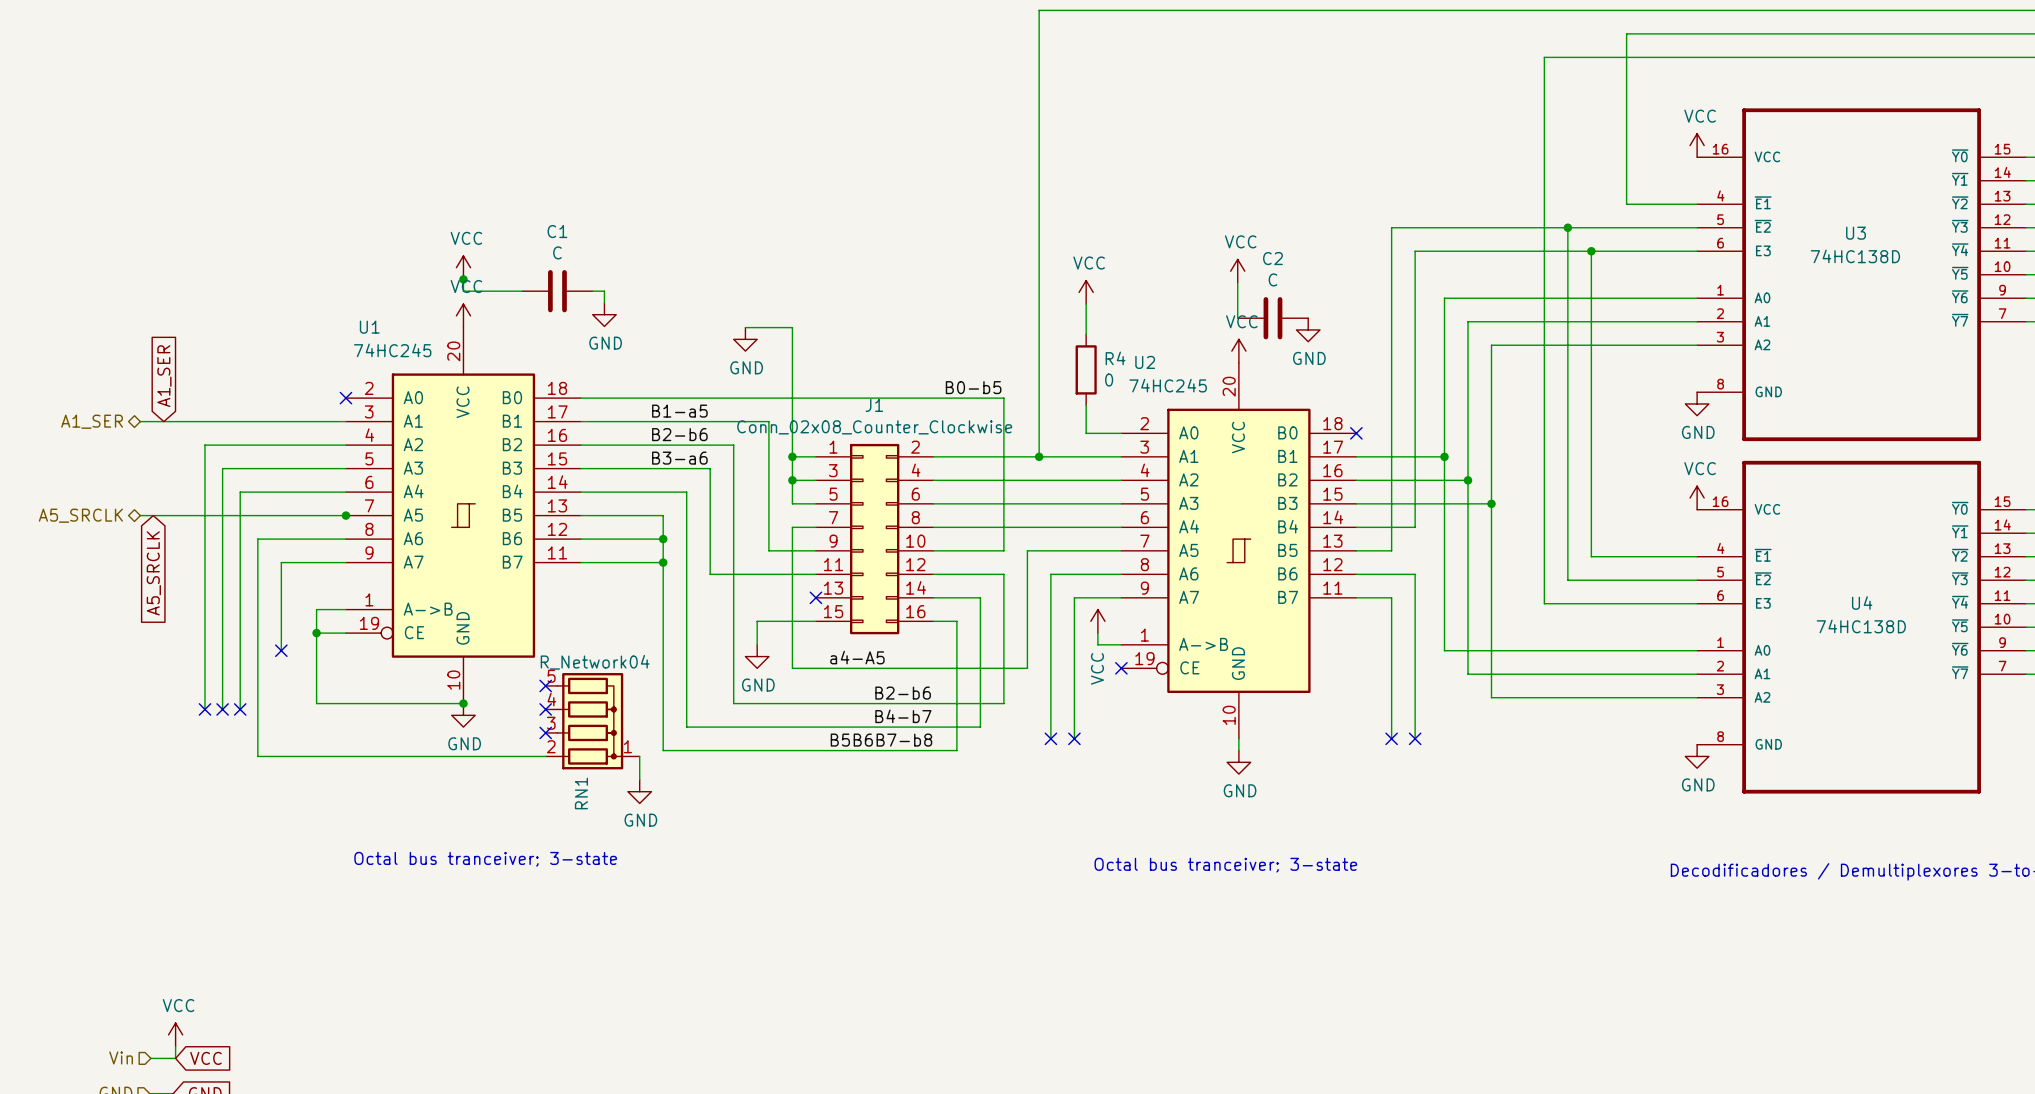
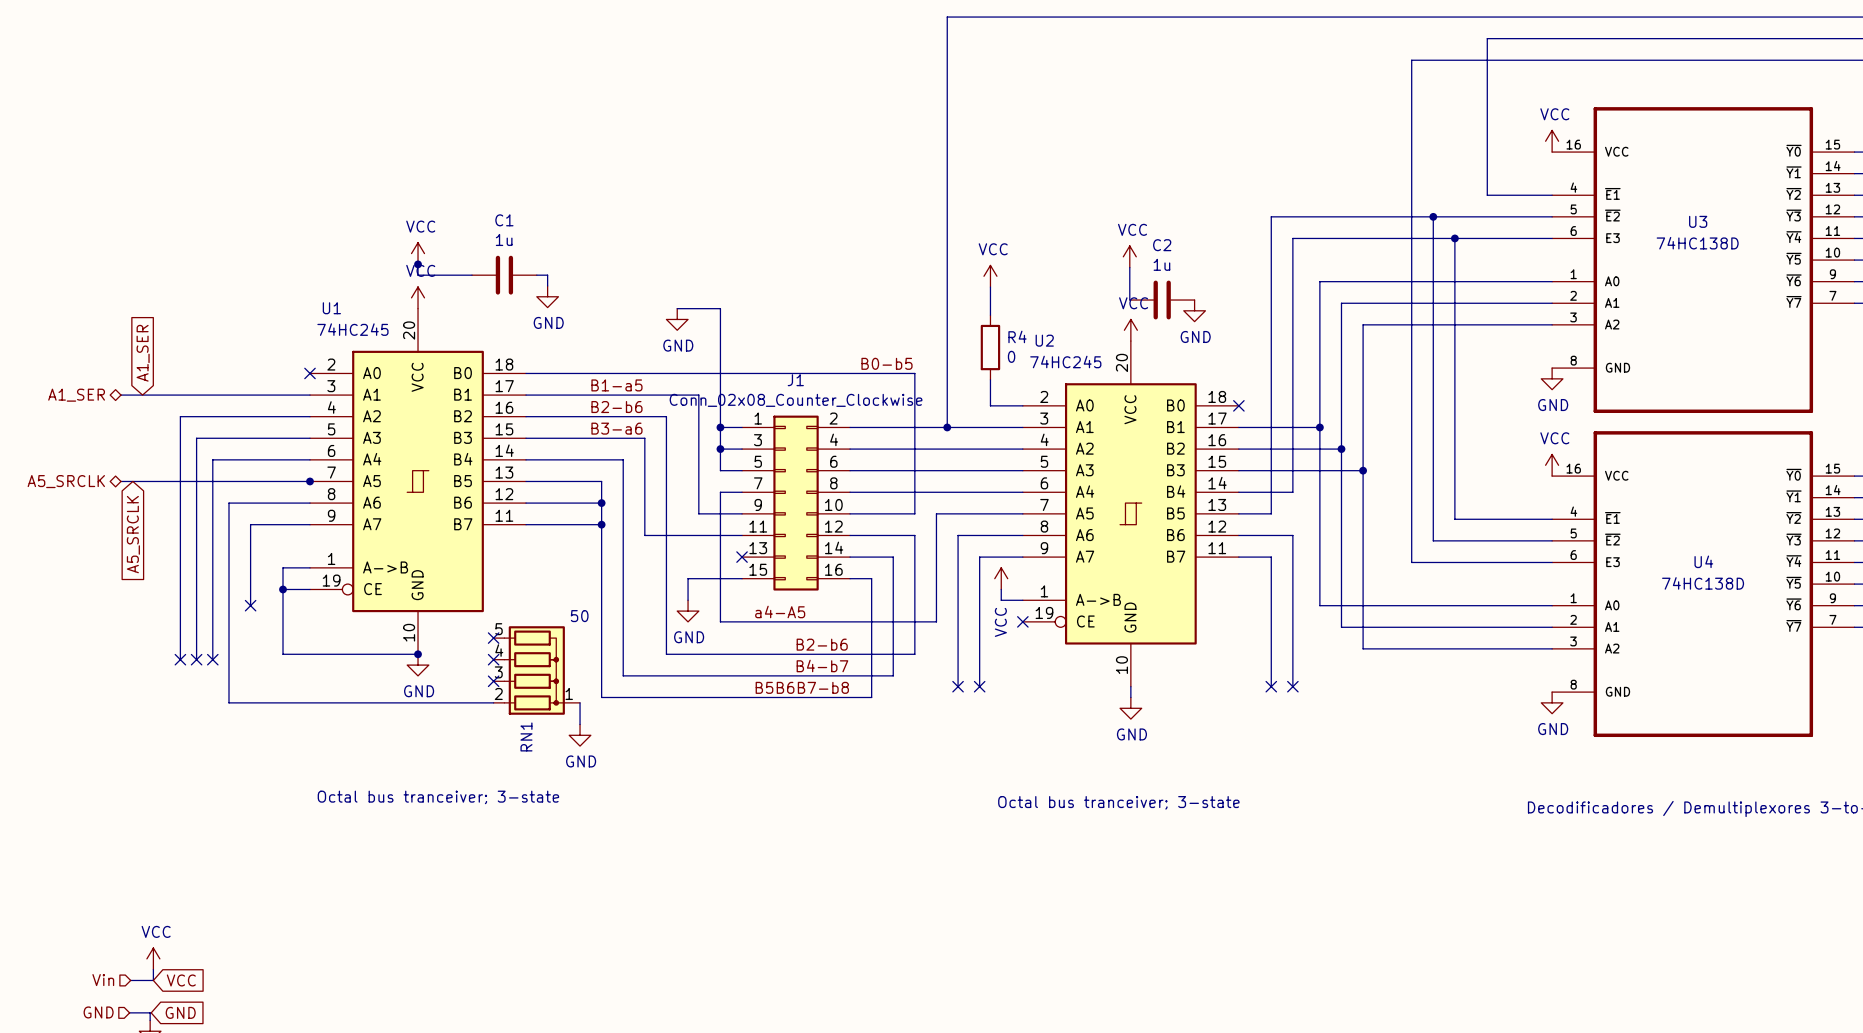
C1 value: C (557, 252) -> 1u (504, 239)
C2 value: C (1272, 279) -> 1u (1161, 264)
RN1 value: R_Network04 (595, 662) -> 50 (579, 616)

